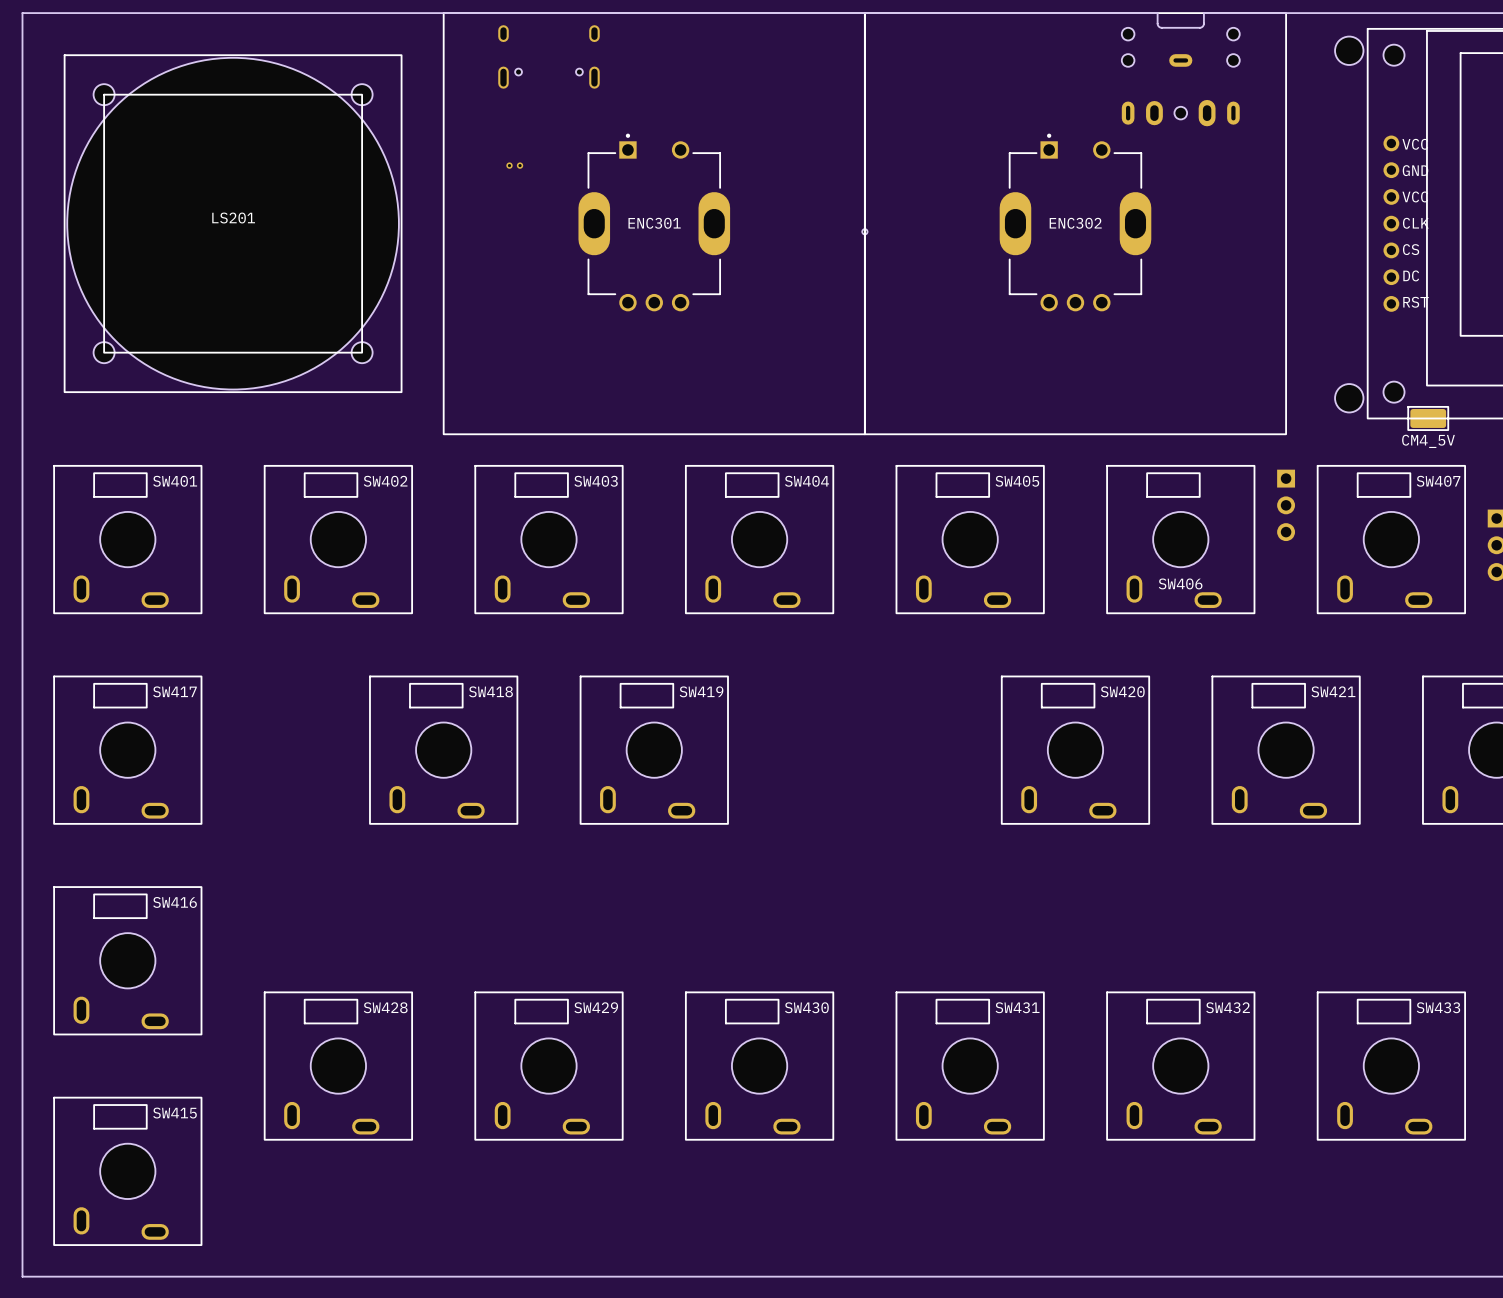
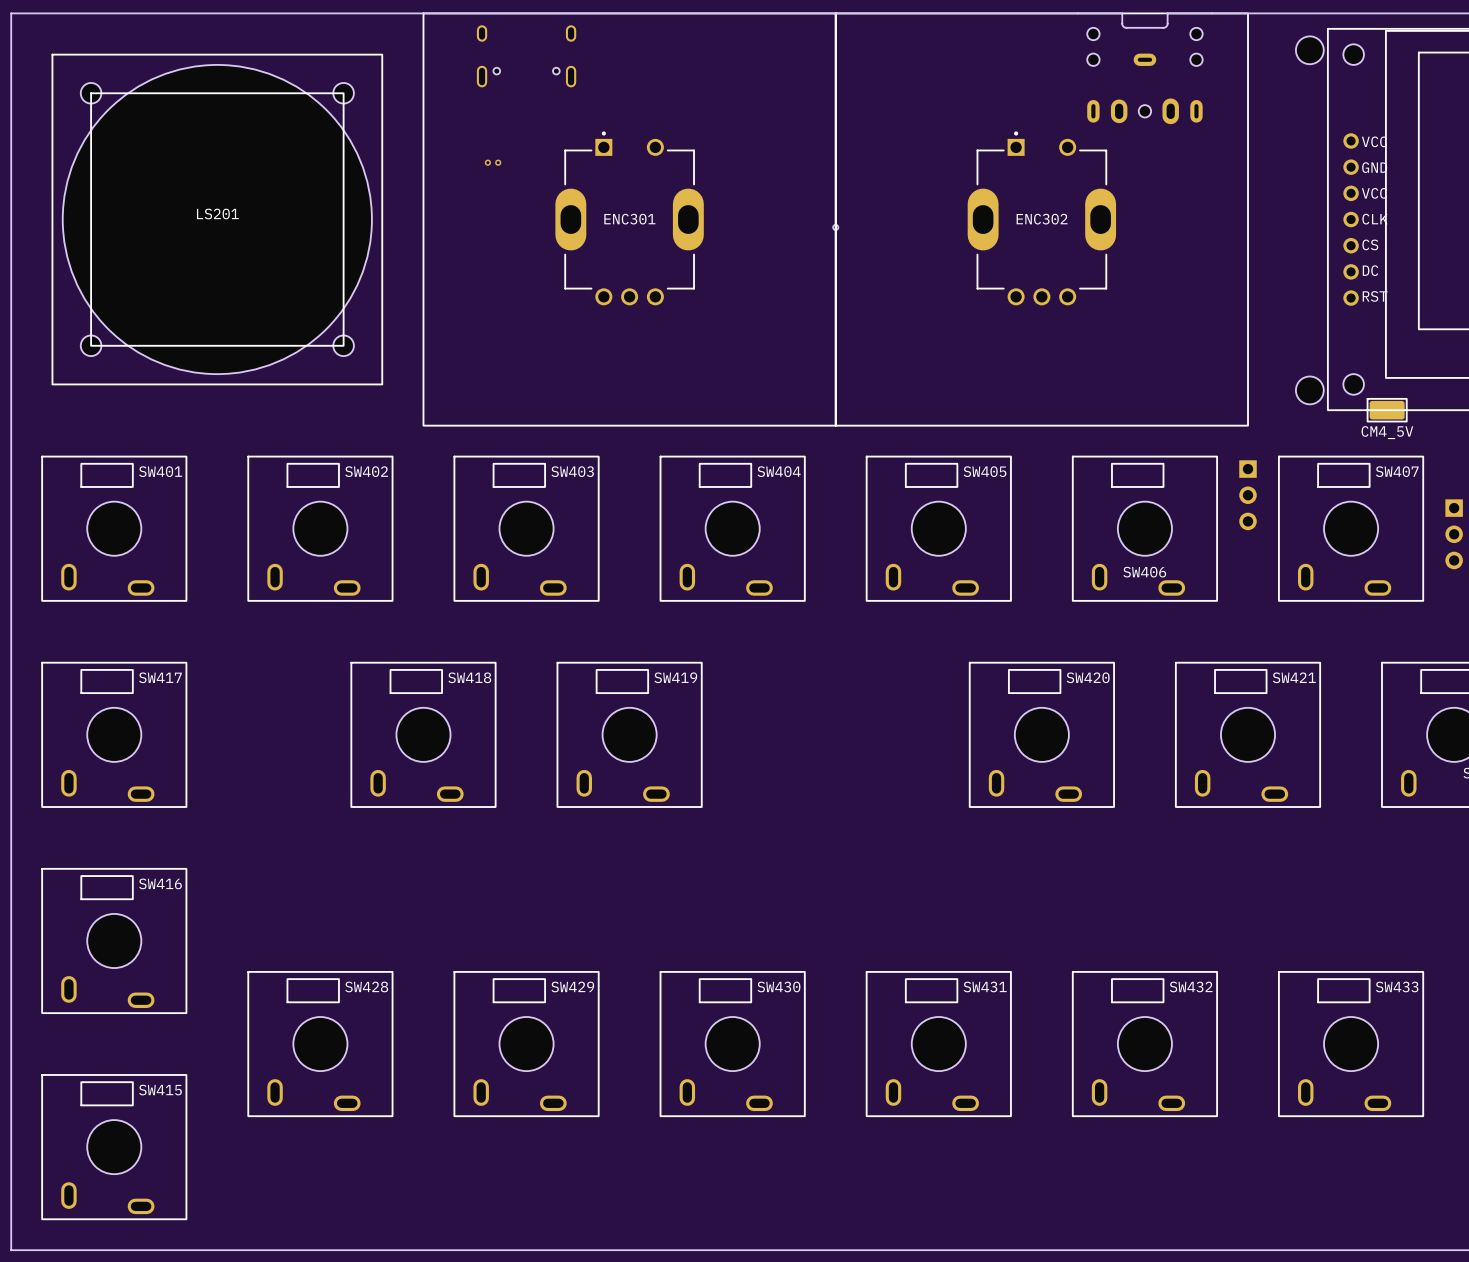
LS201 footprint: [64, 54, 403, 393] -> [51, 54, 383, 385]

